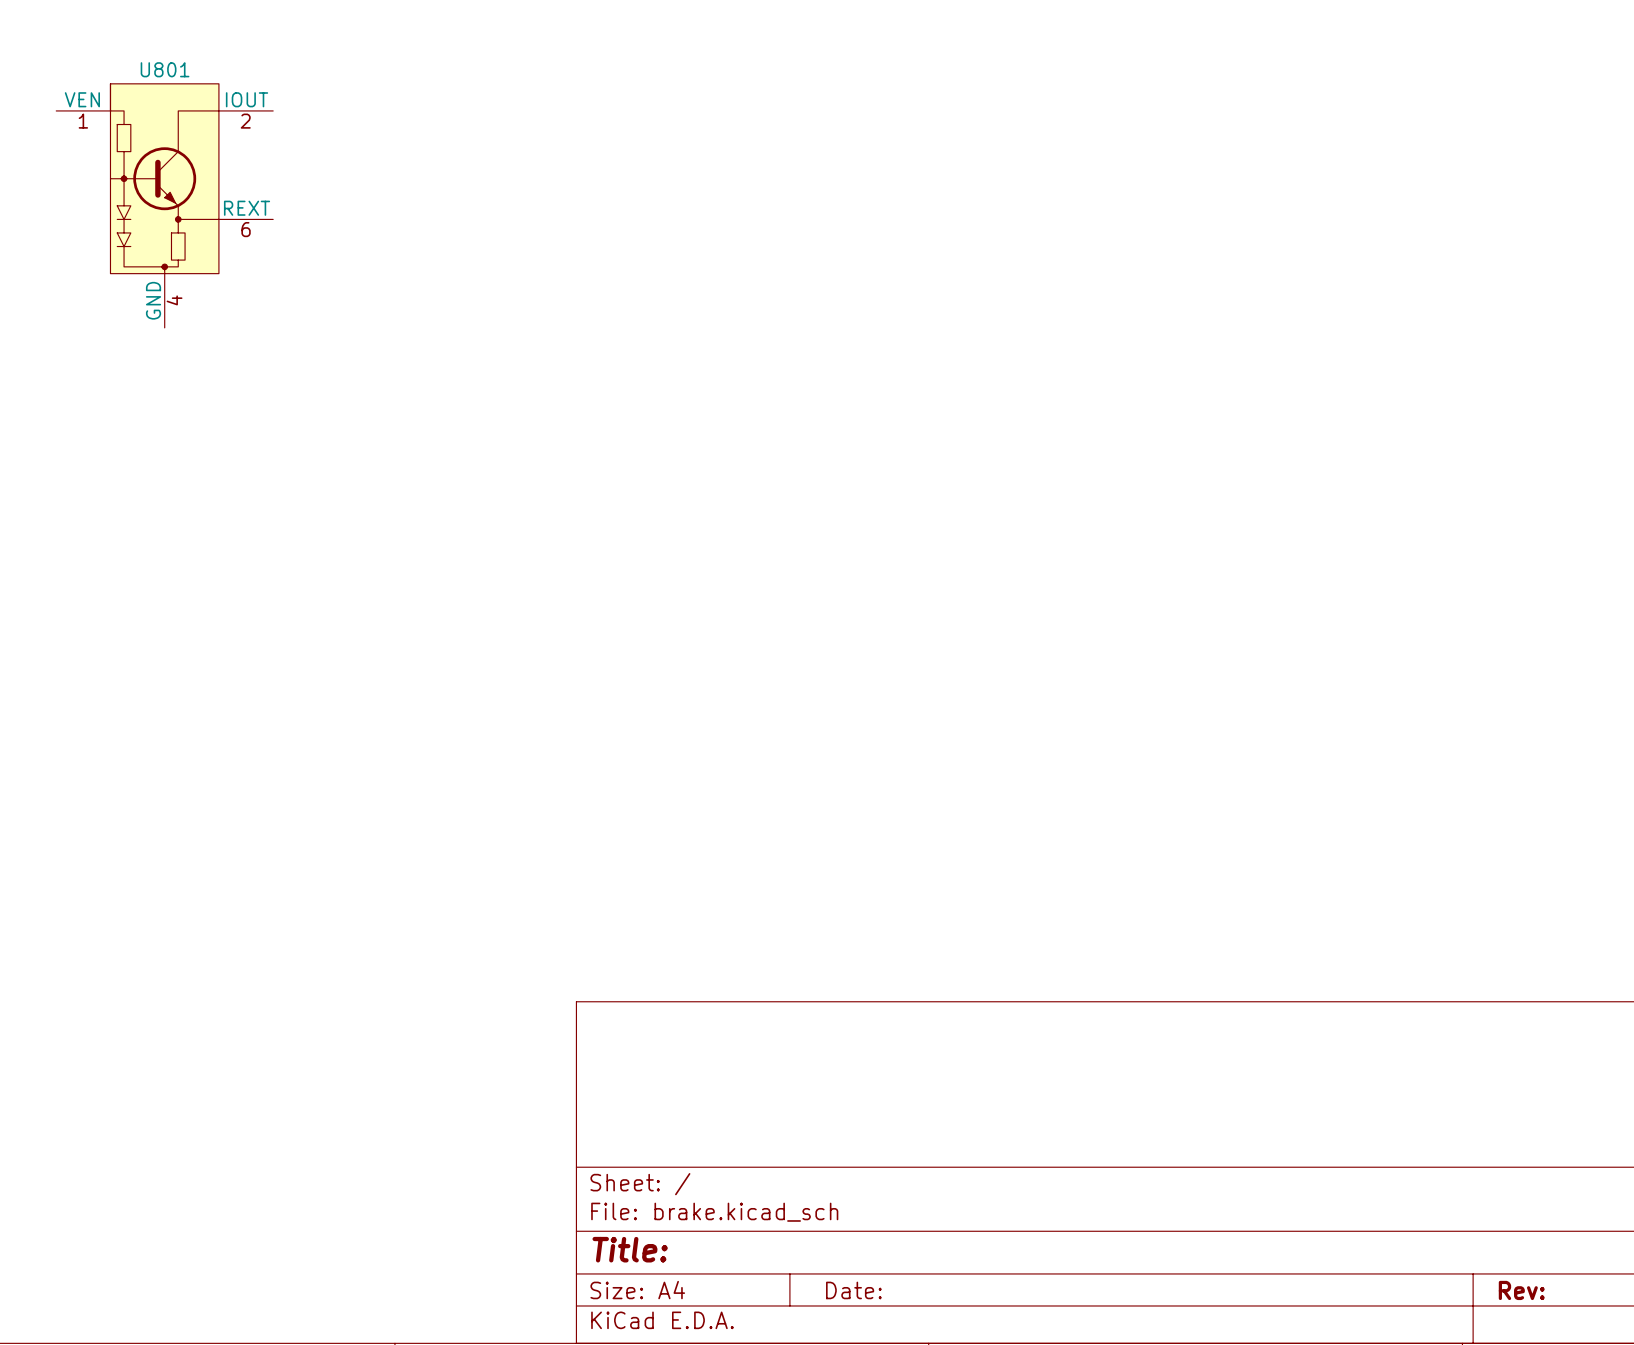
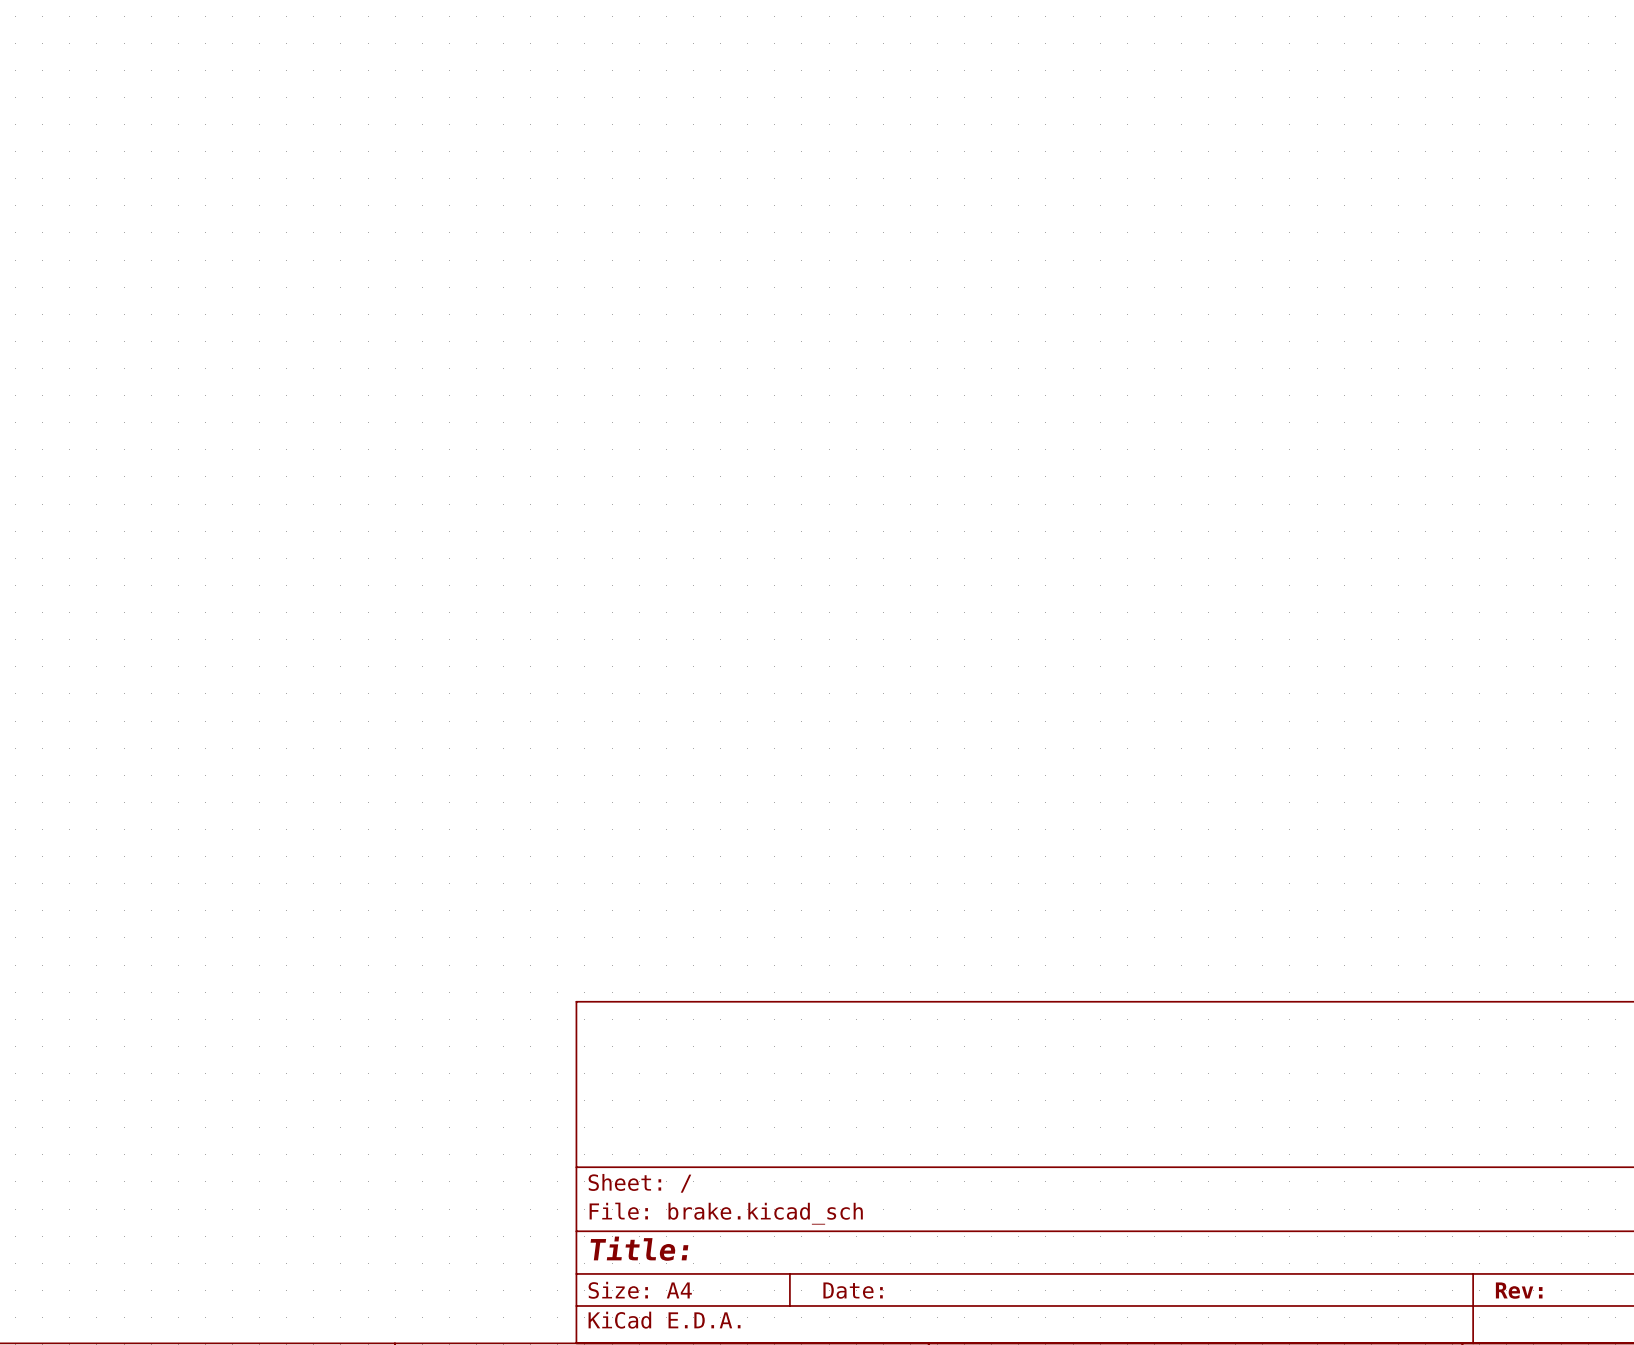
U801: (164, 205) -> none

